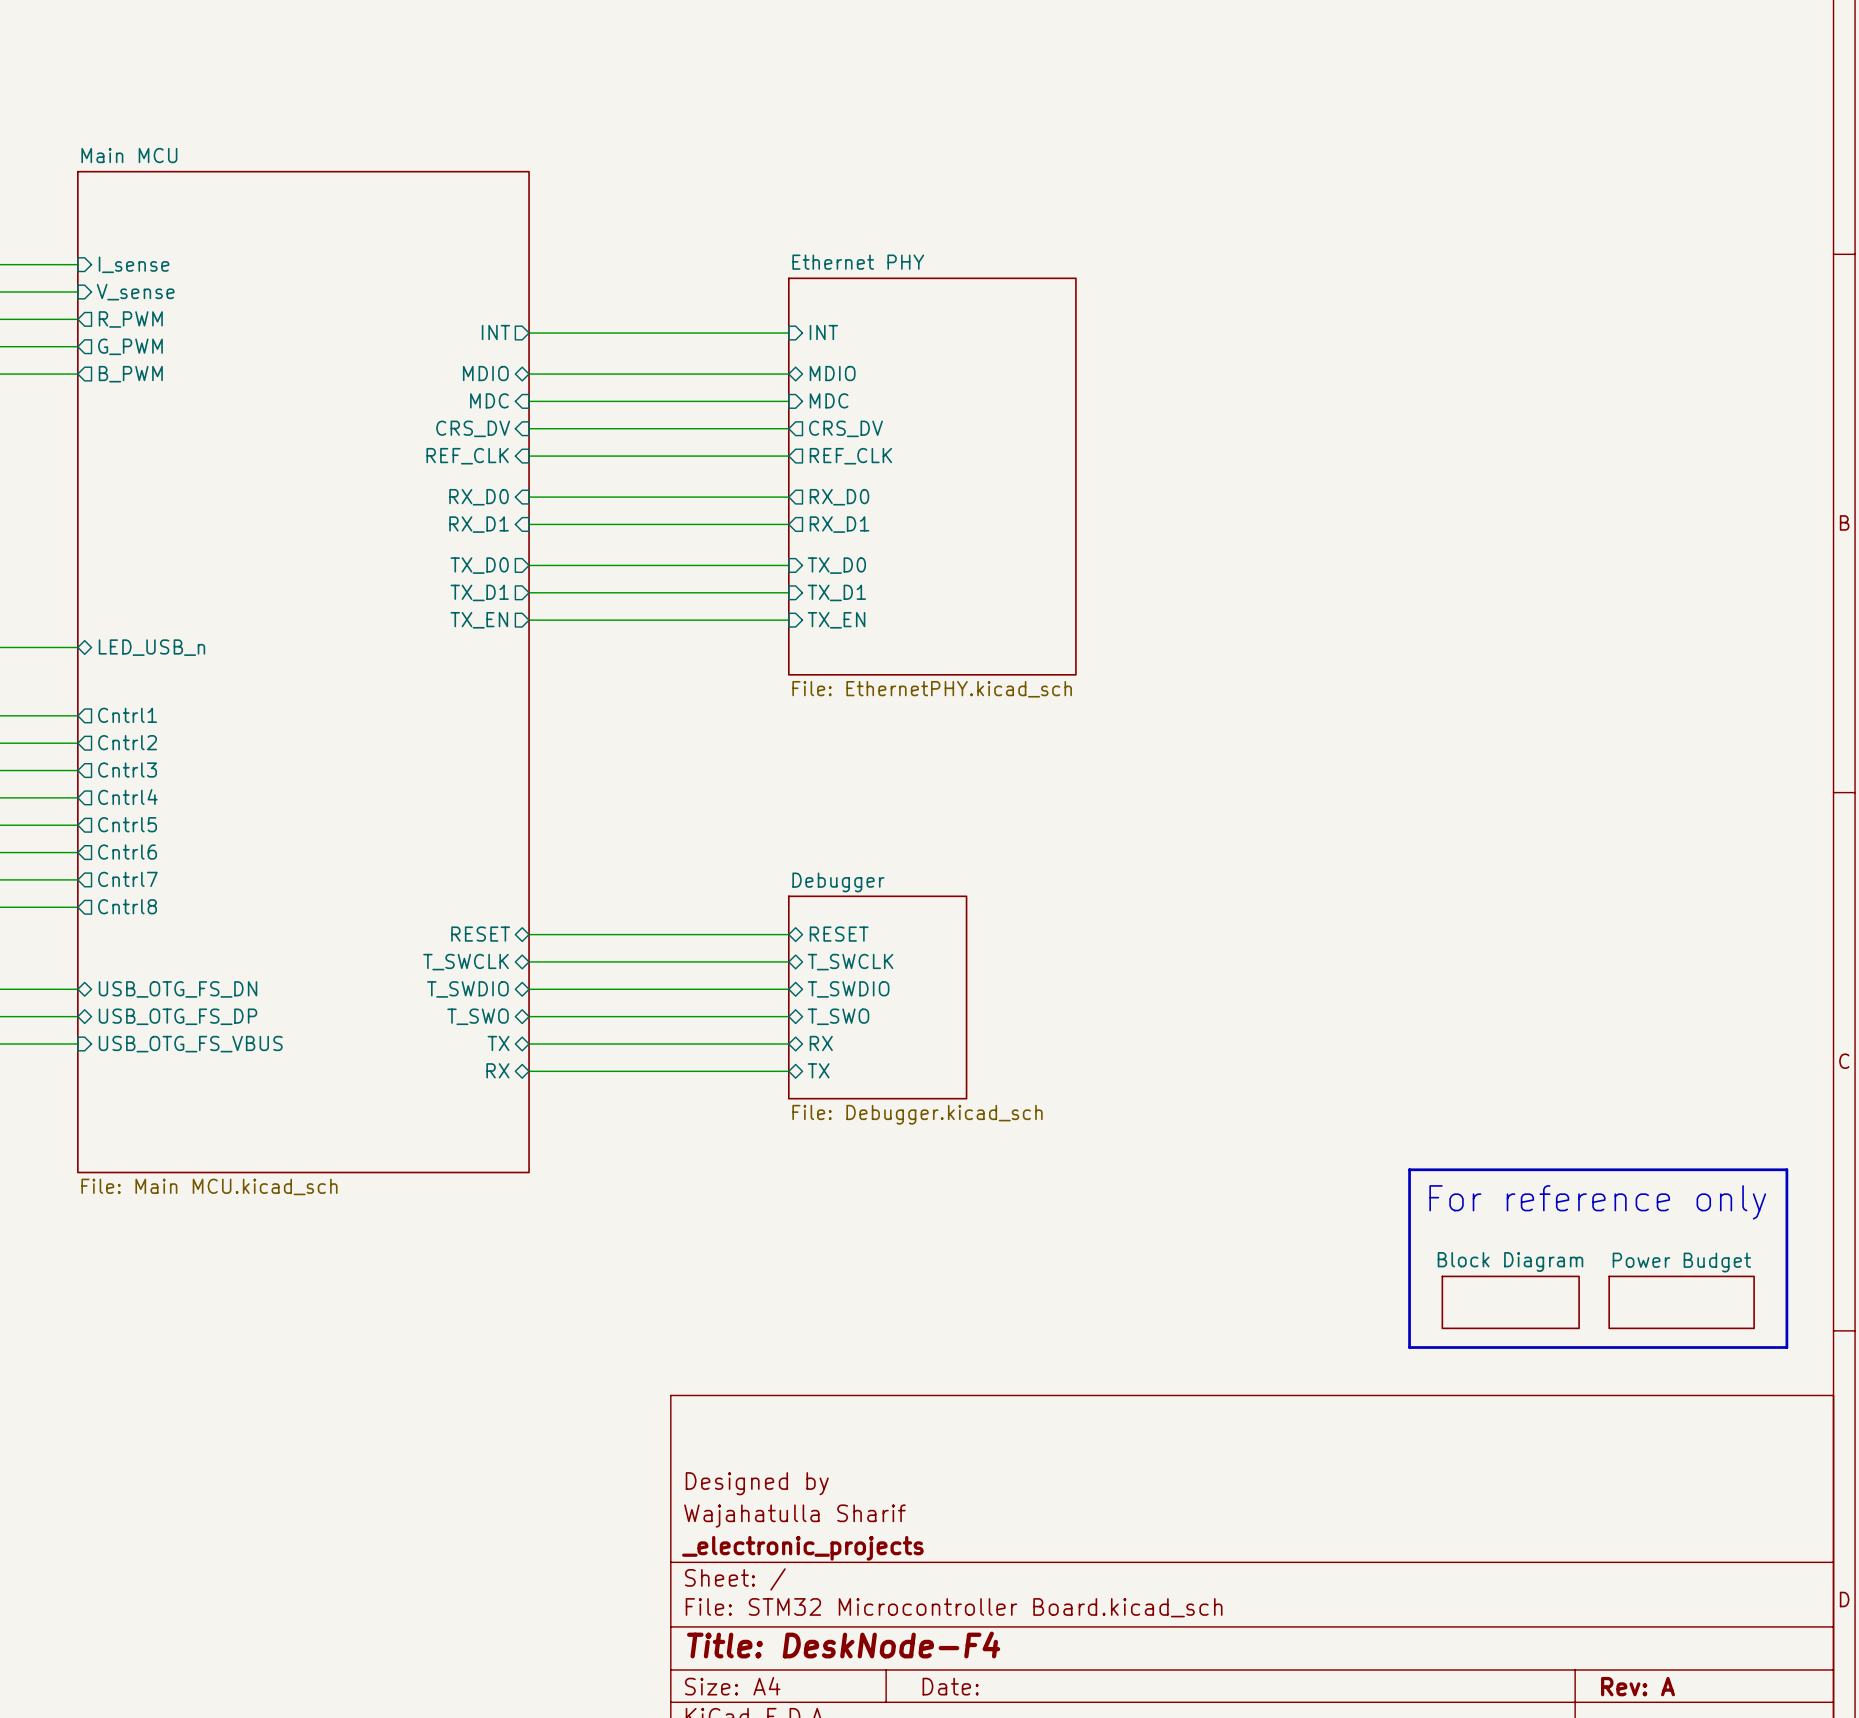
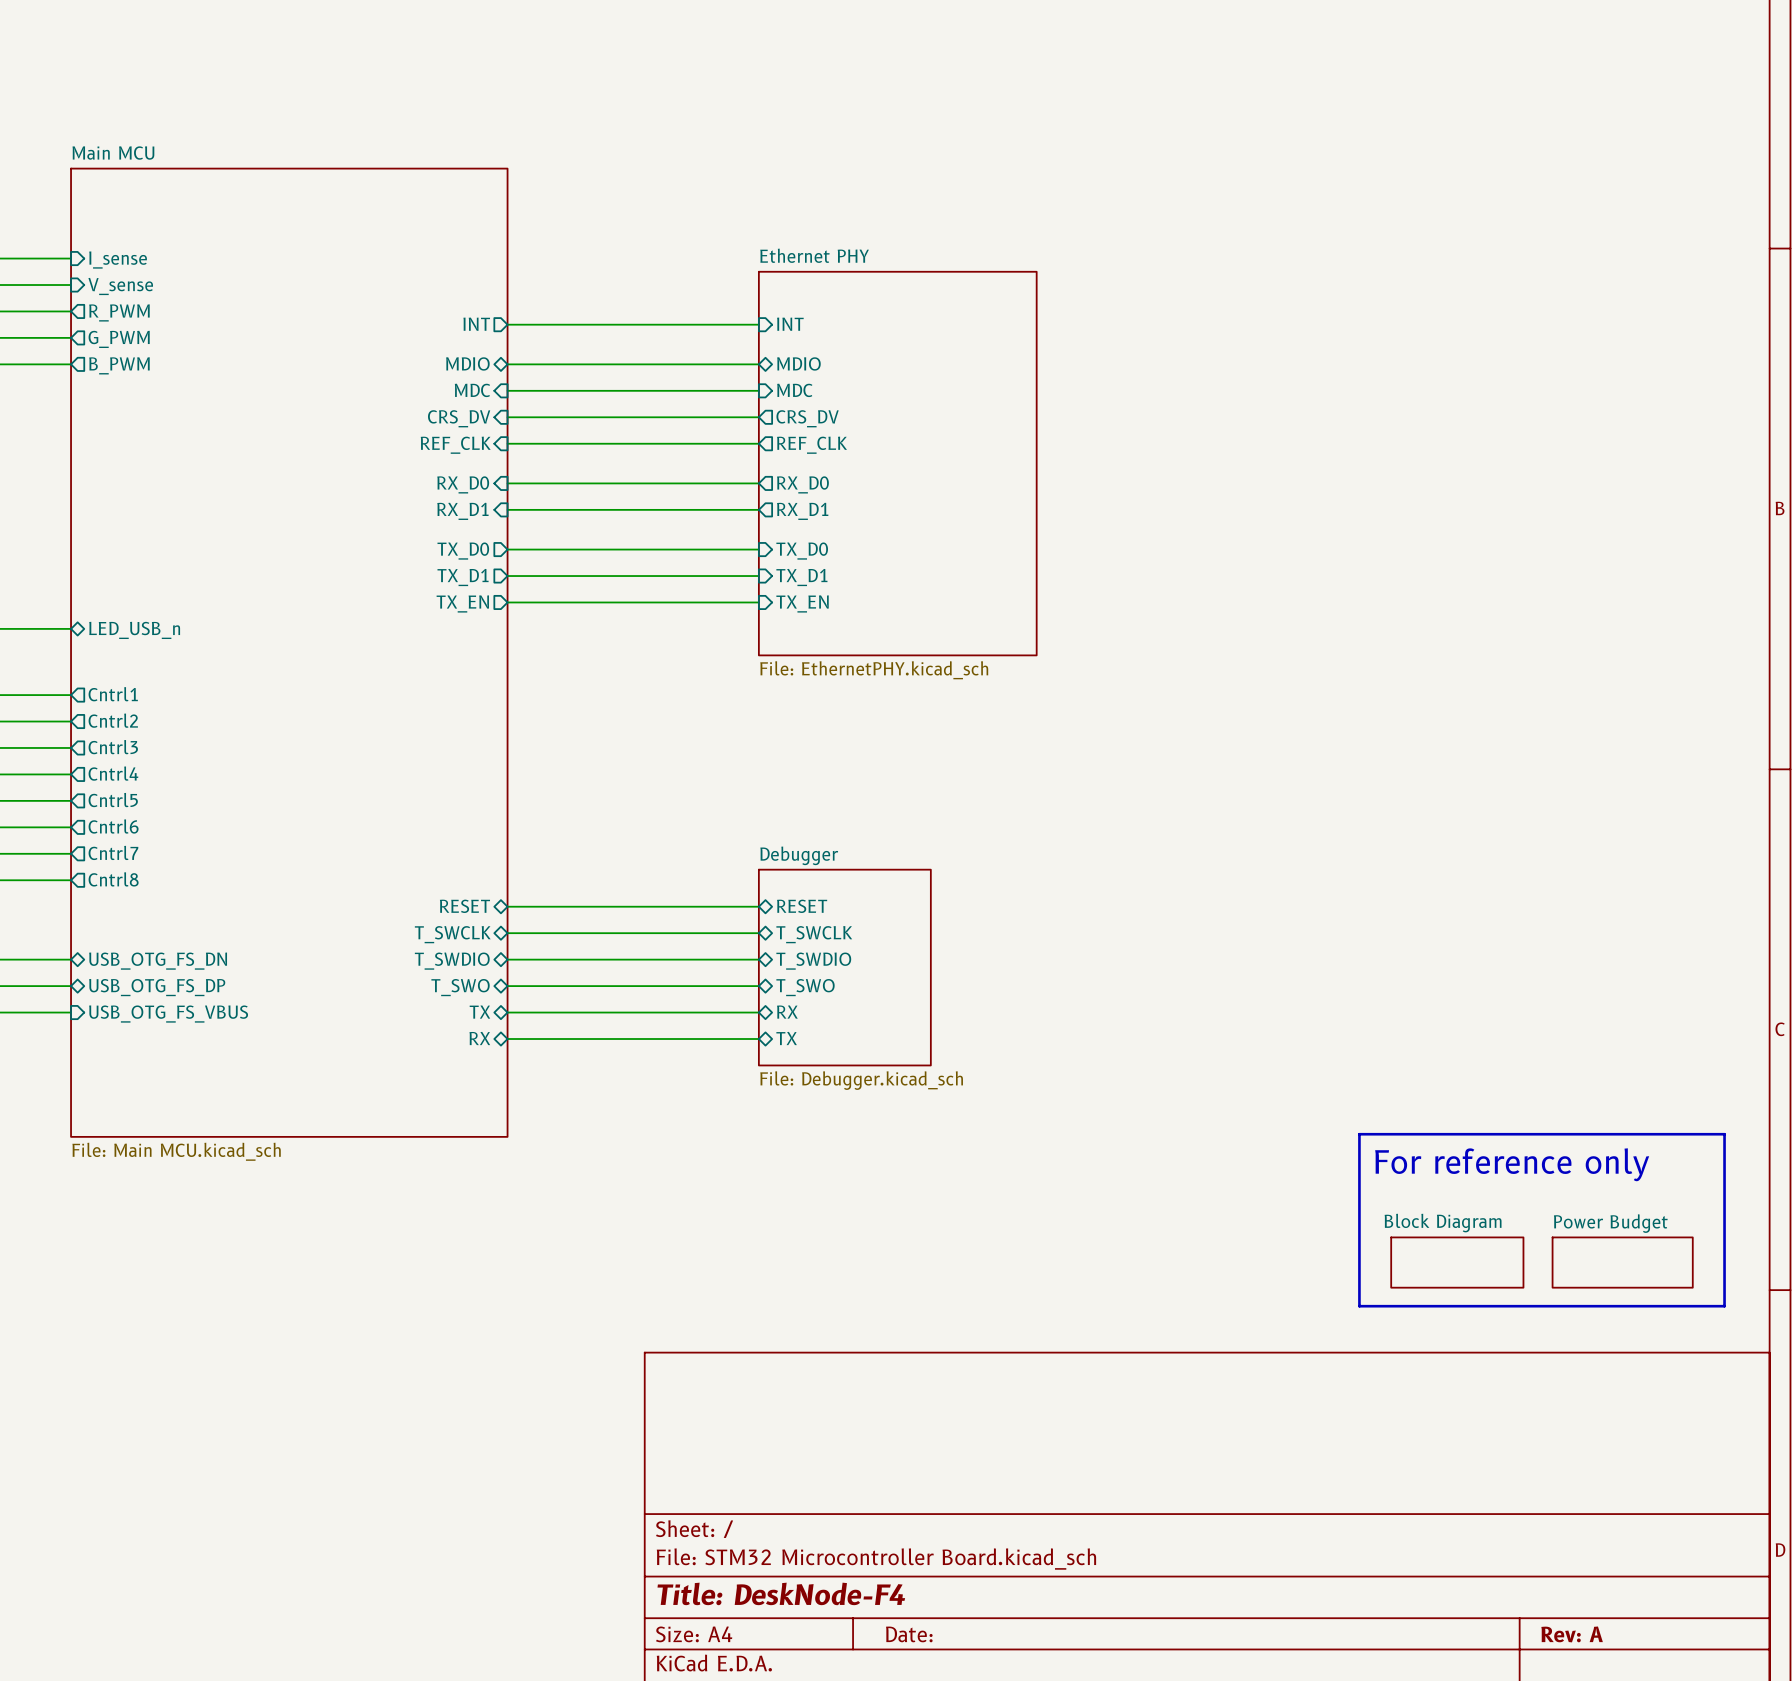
title block: Designed by (757, 1483) -> none
title block: Wajahatulla Sharif (794, 1515) -> none
title block: _electronic_projects (802, 1548) -> none

